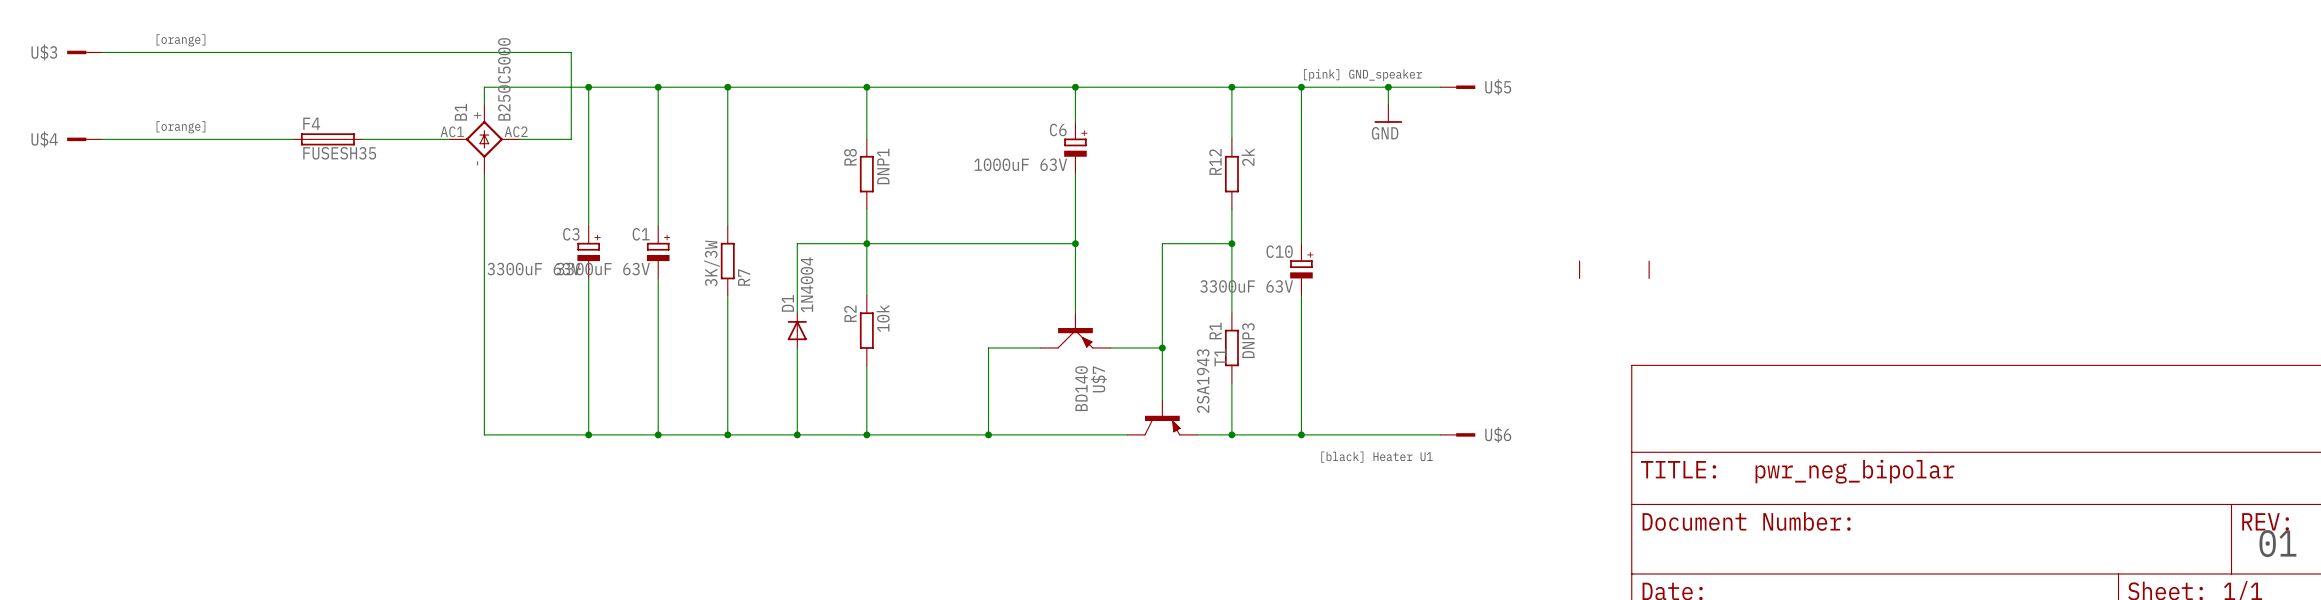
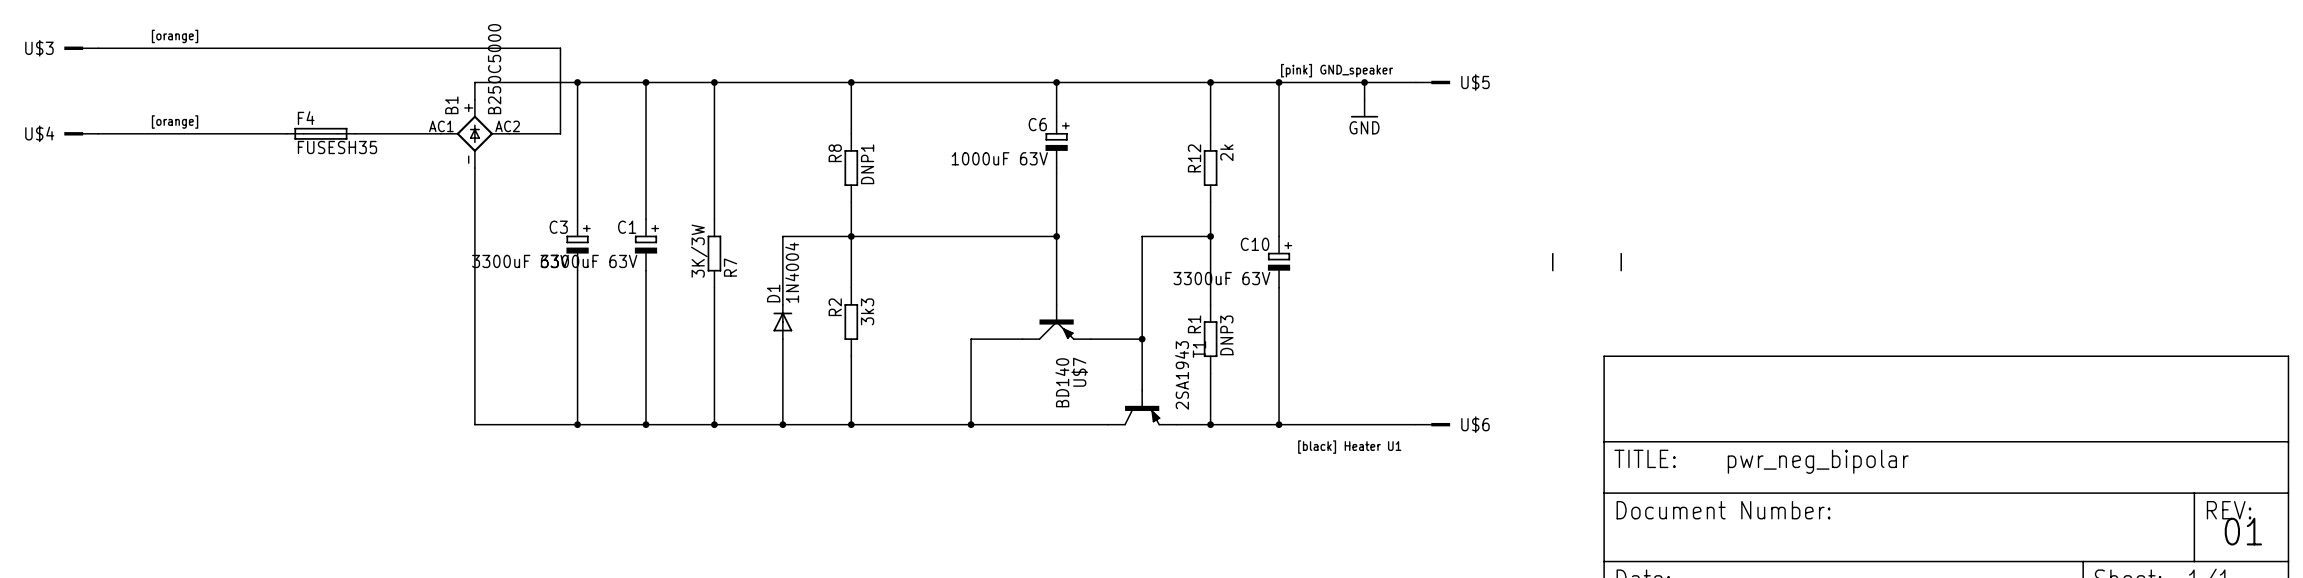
R2 value: 10k (883, 318) -> 3k3 (867, 311)

